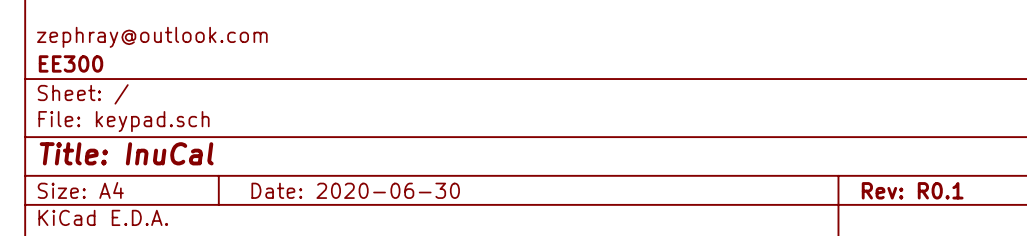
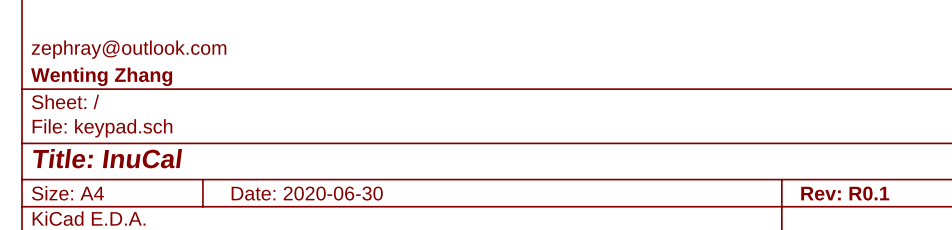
title block: EE300 (71, 63) -> Wenting Zhang (101, 76)

